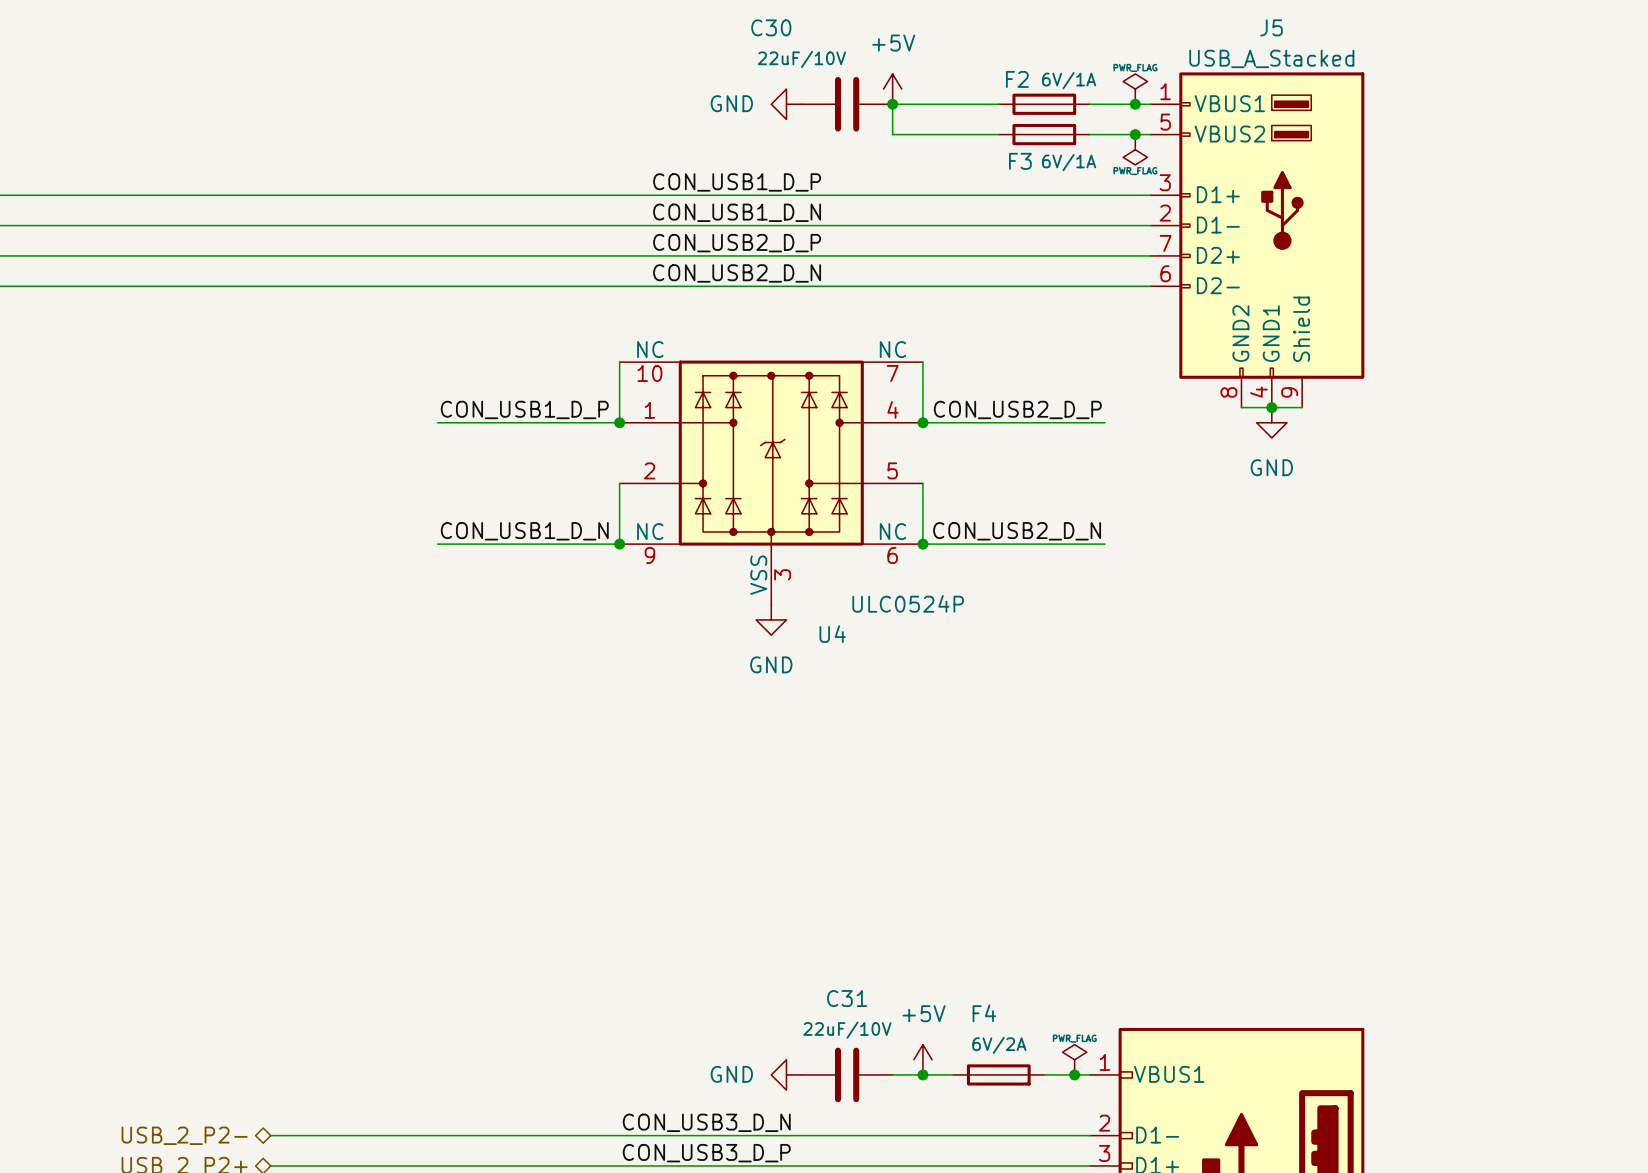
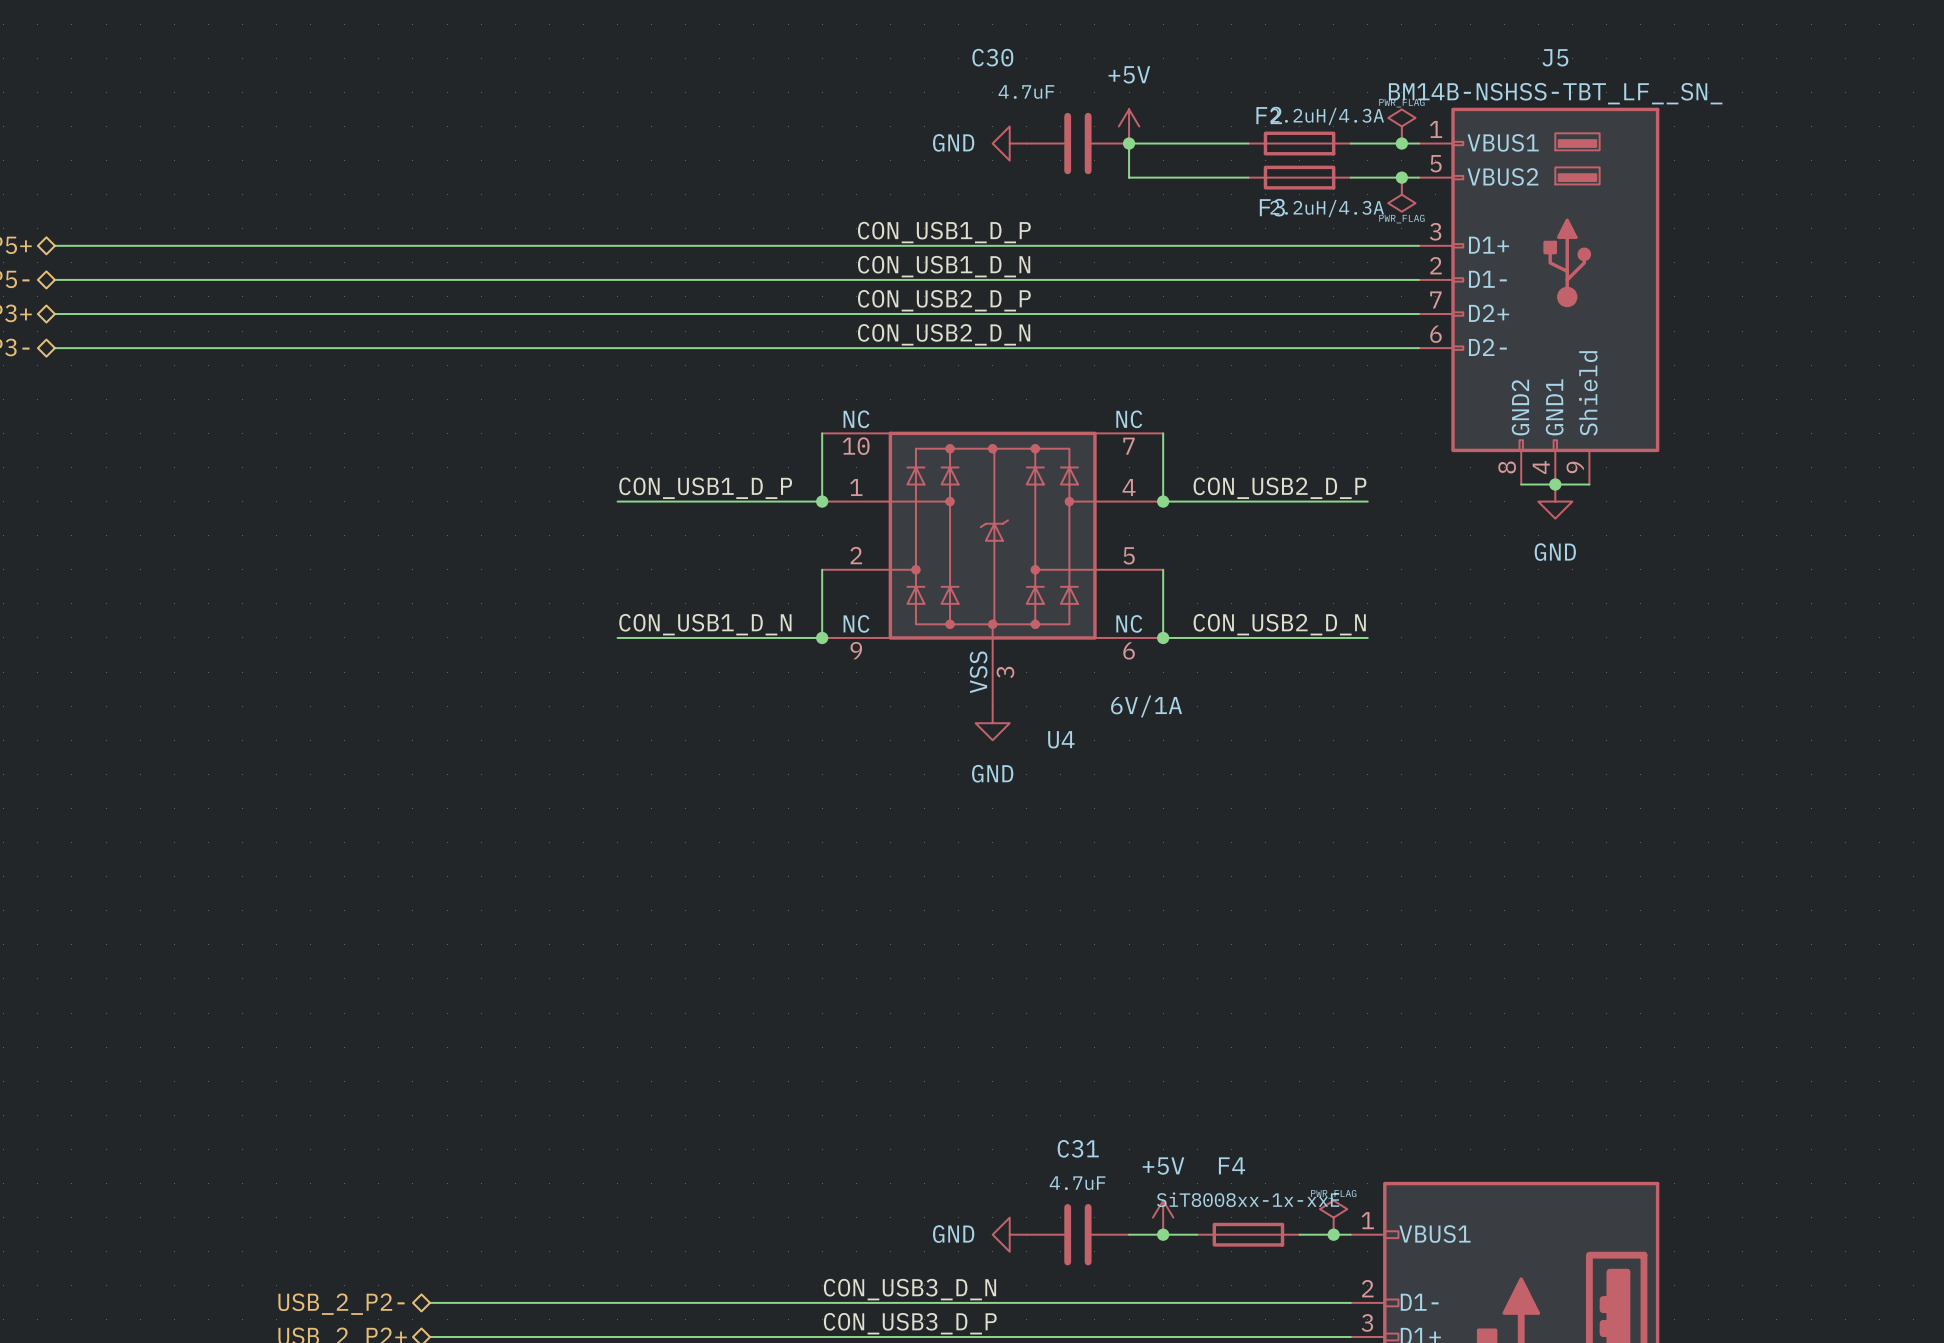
J5 value: USB_A_Stacked (1271, 58) -> BM14B-NSHSS-TBT_LF__SN_ (1555, 93)
C30 value: 22uF/10V (801, 59) -> 4.7uF (1026, 91)
F2 value: 6V/1A (1069, 80) -> 2.2uH/4.3A (1327, 116)
F3 value: 6V/1A (1069, 162) -> 2.2uH/4.3A (1327, 208)
U4 value: ULC0524P (908, 603) -> 6V/1A (1146, 706)
C31 value: 22uF/10V (847, 1030) -> 4.7uF (1077, 1183)
F4 value: 6V/2A (999, 1045) -> SiT8008xx-1x-xxE (1248, 1199)

